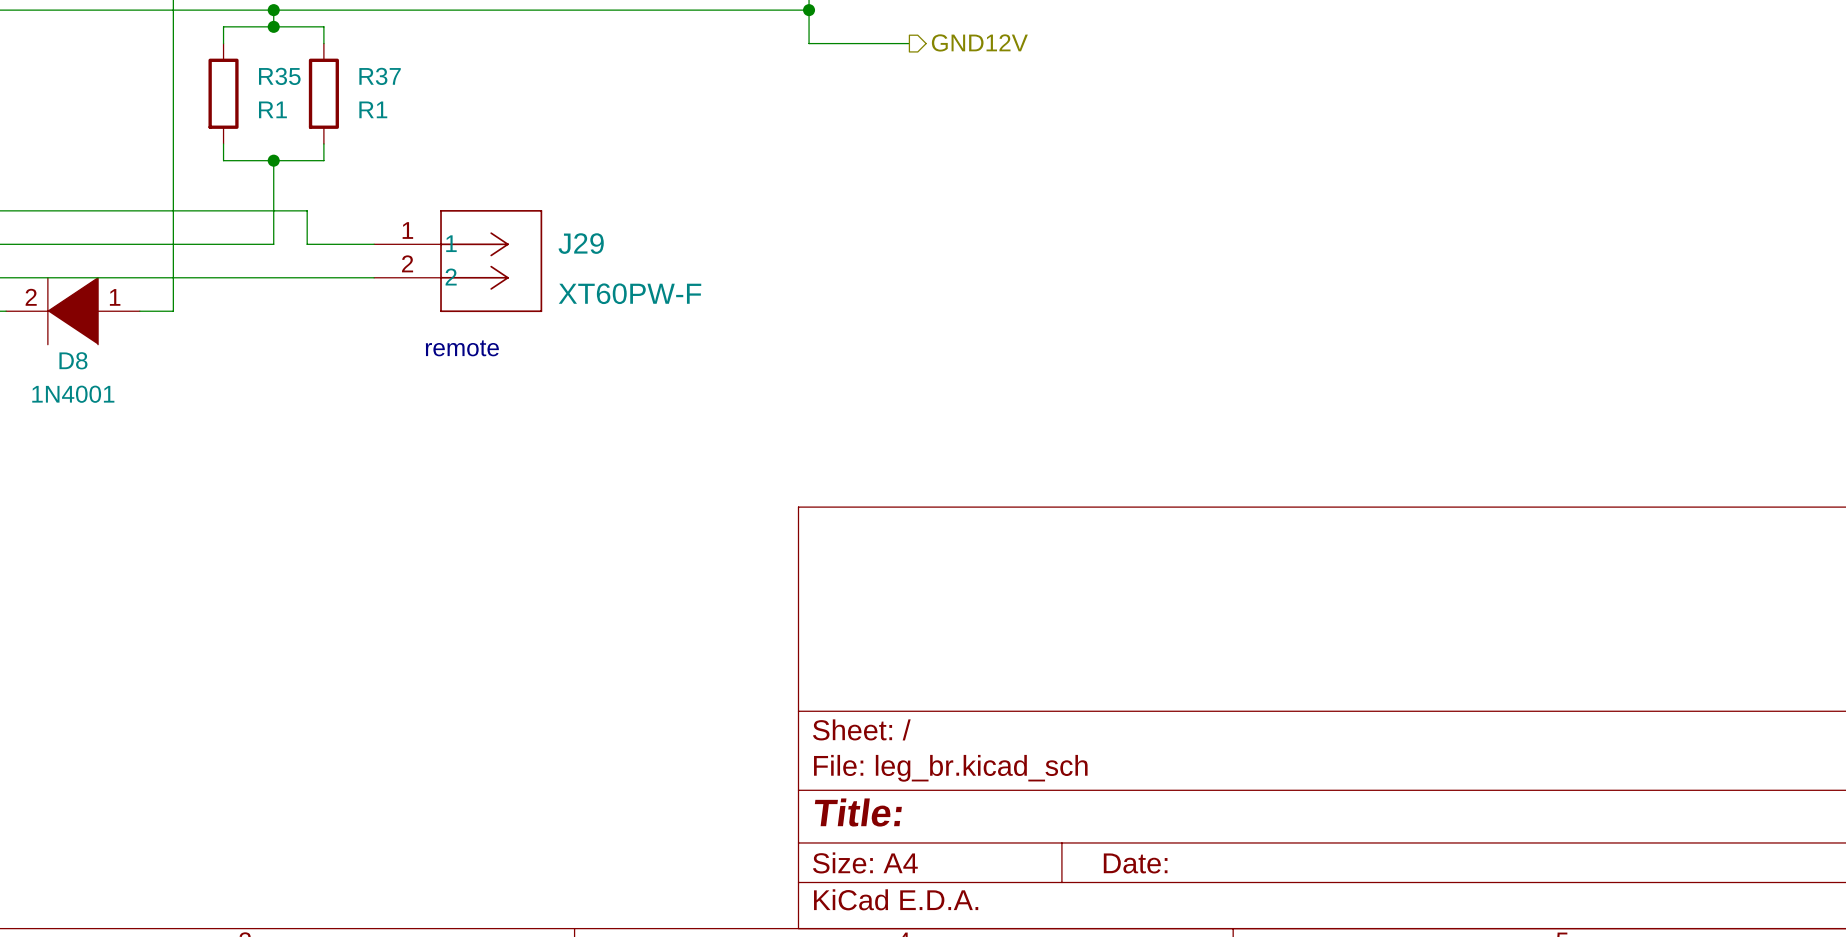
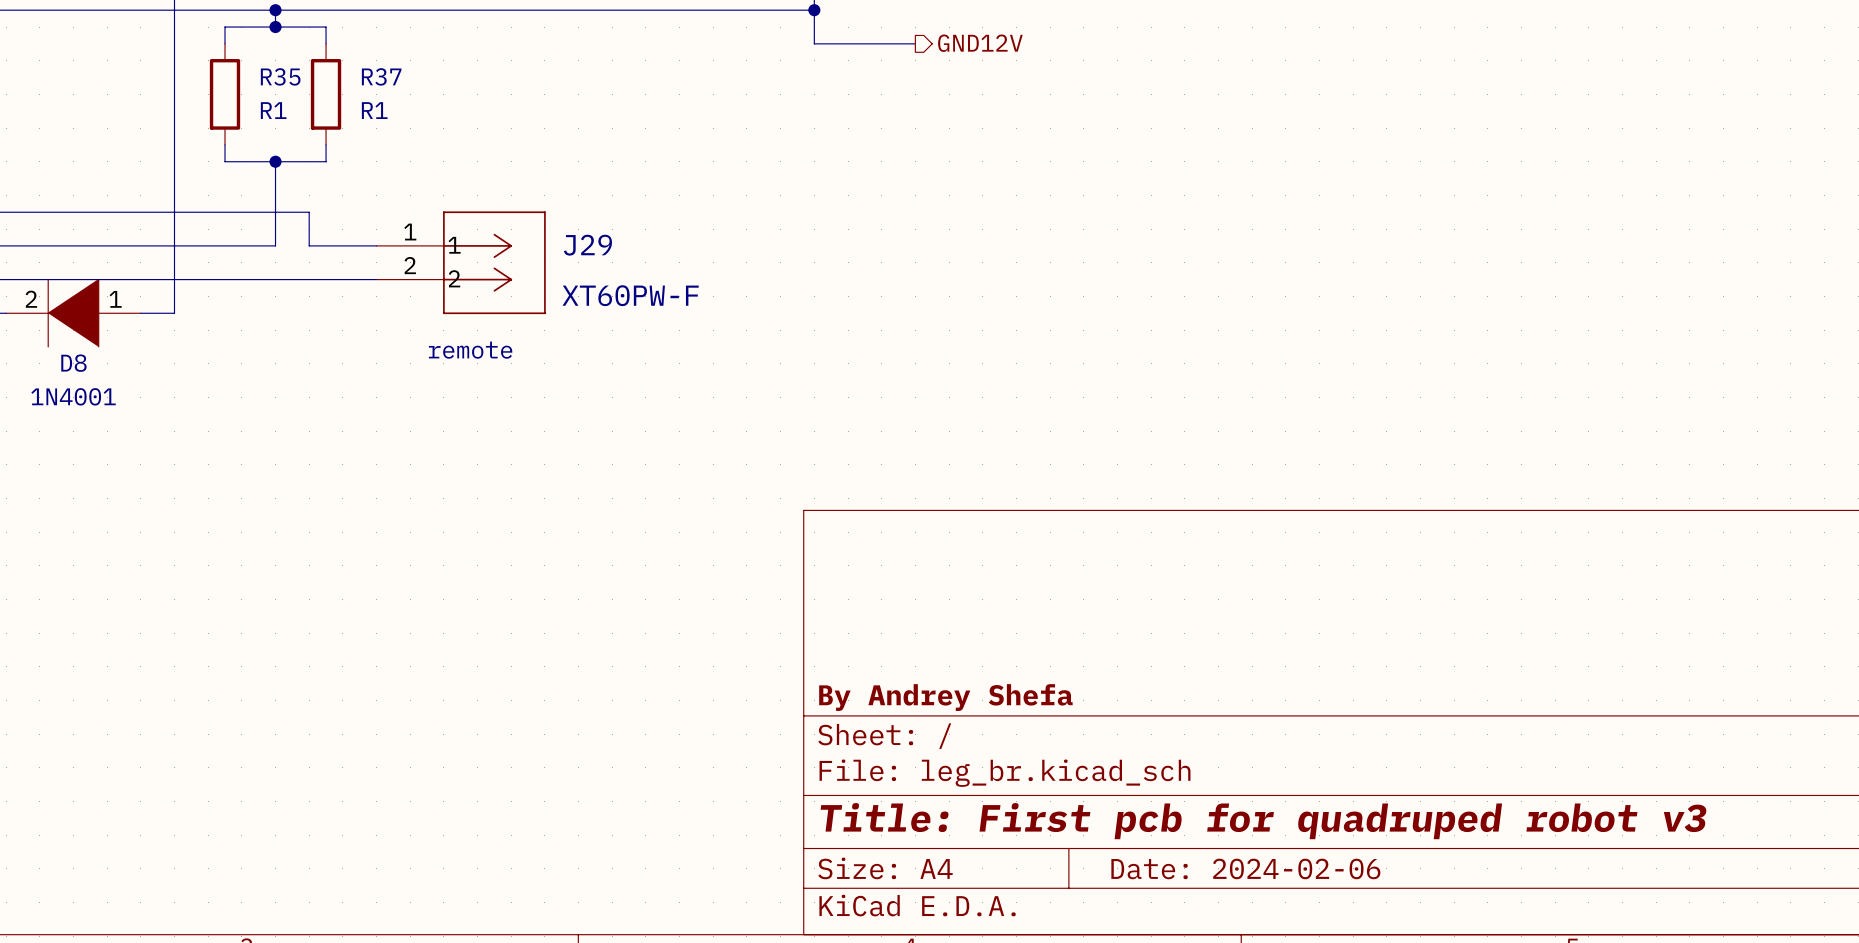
title block: none -> By Andrey Shefa (945, 697)
title block: Title: (858, 812) -> Title: First pcb for quadruped robot v3 (1263, 821)
title block: Date: (1135, 863) -> Date: 2024-02-06 (1245, 868)

